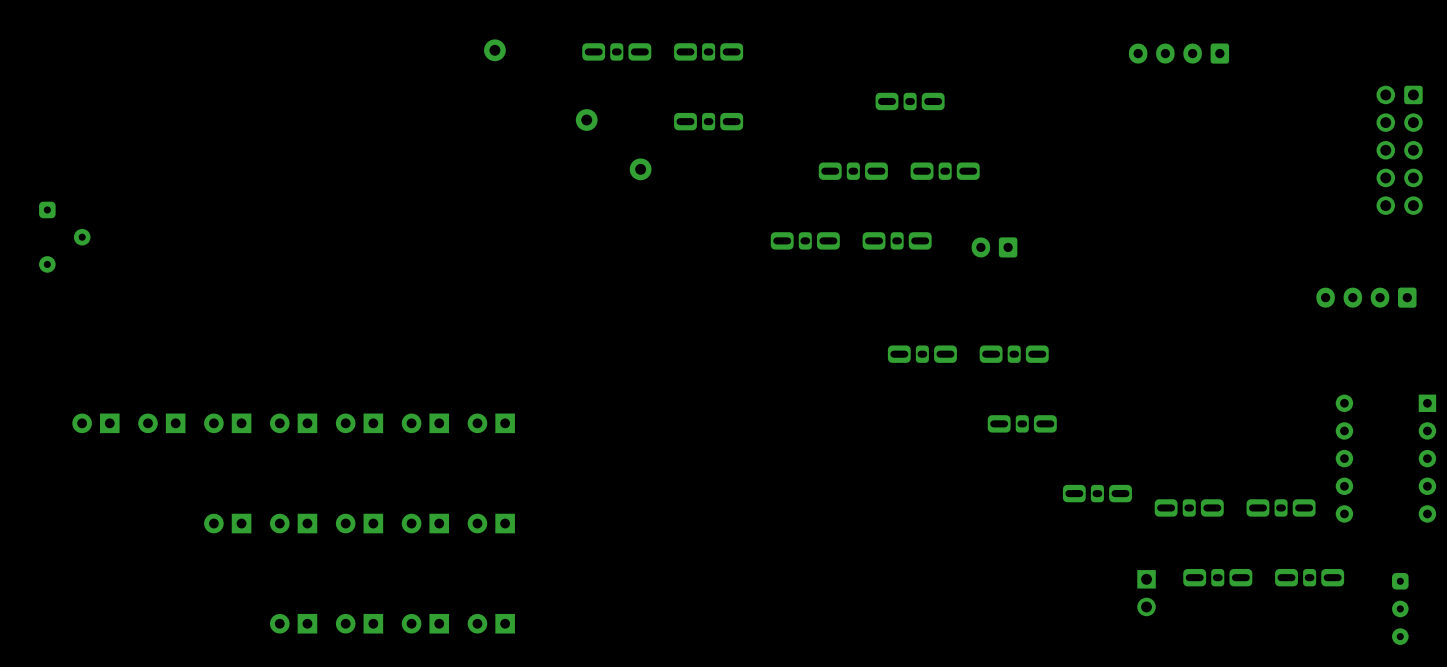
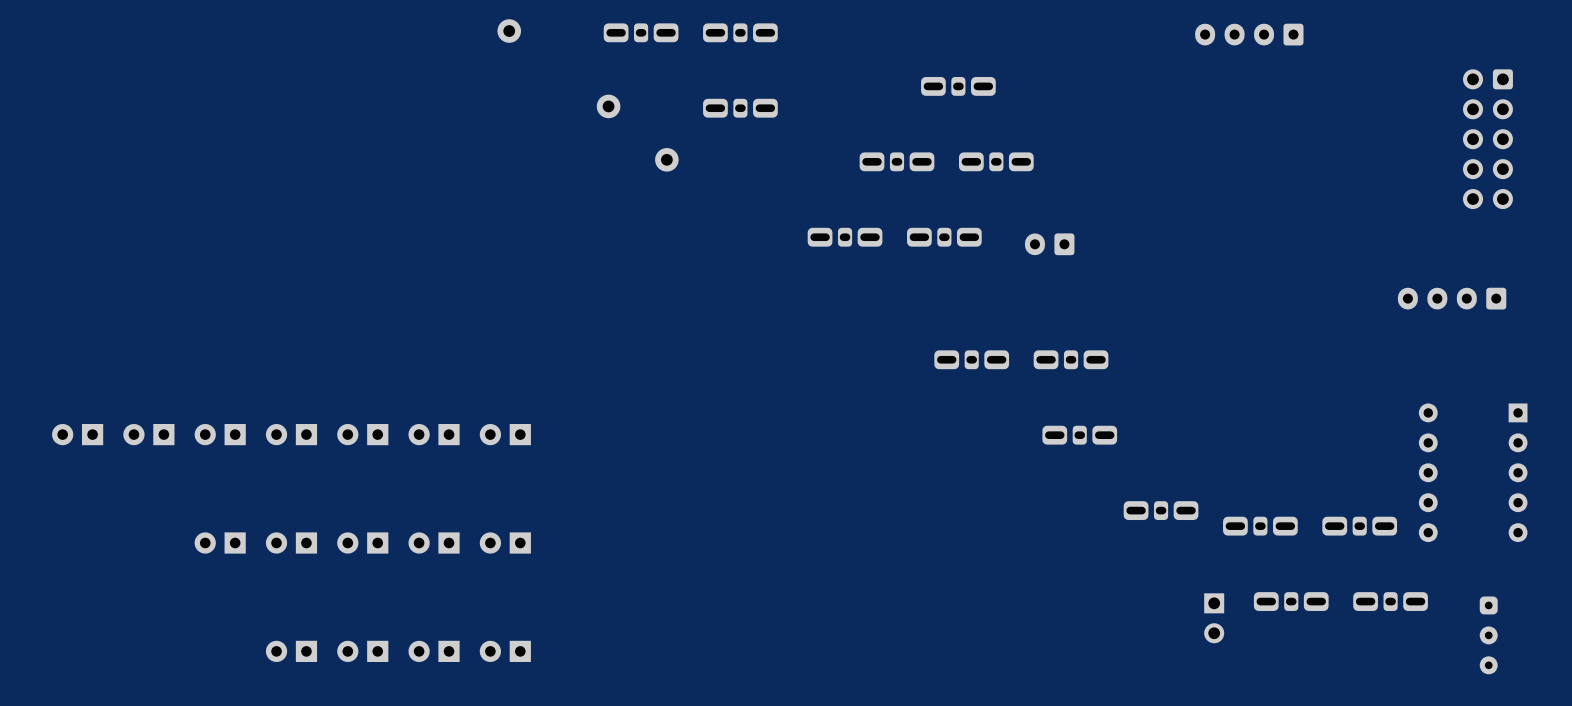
part: (64, 237) -> none

